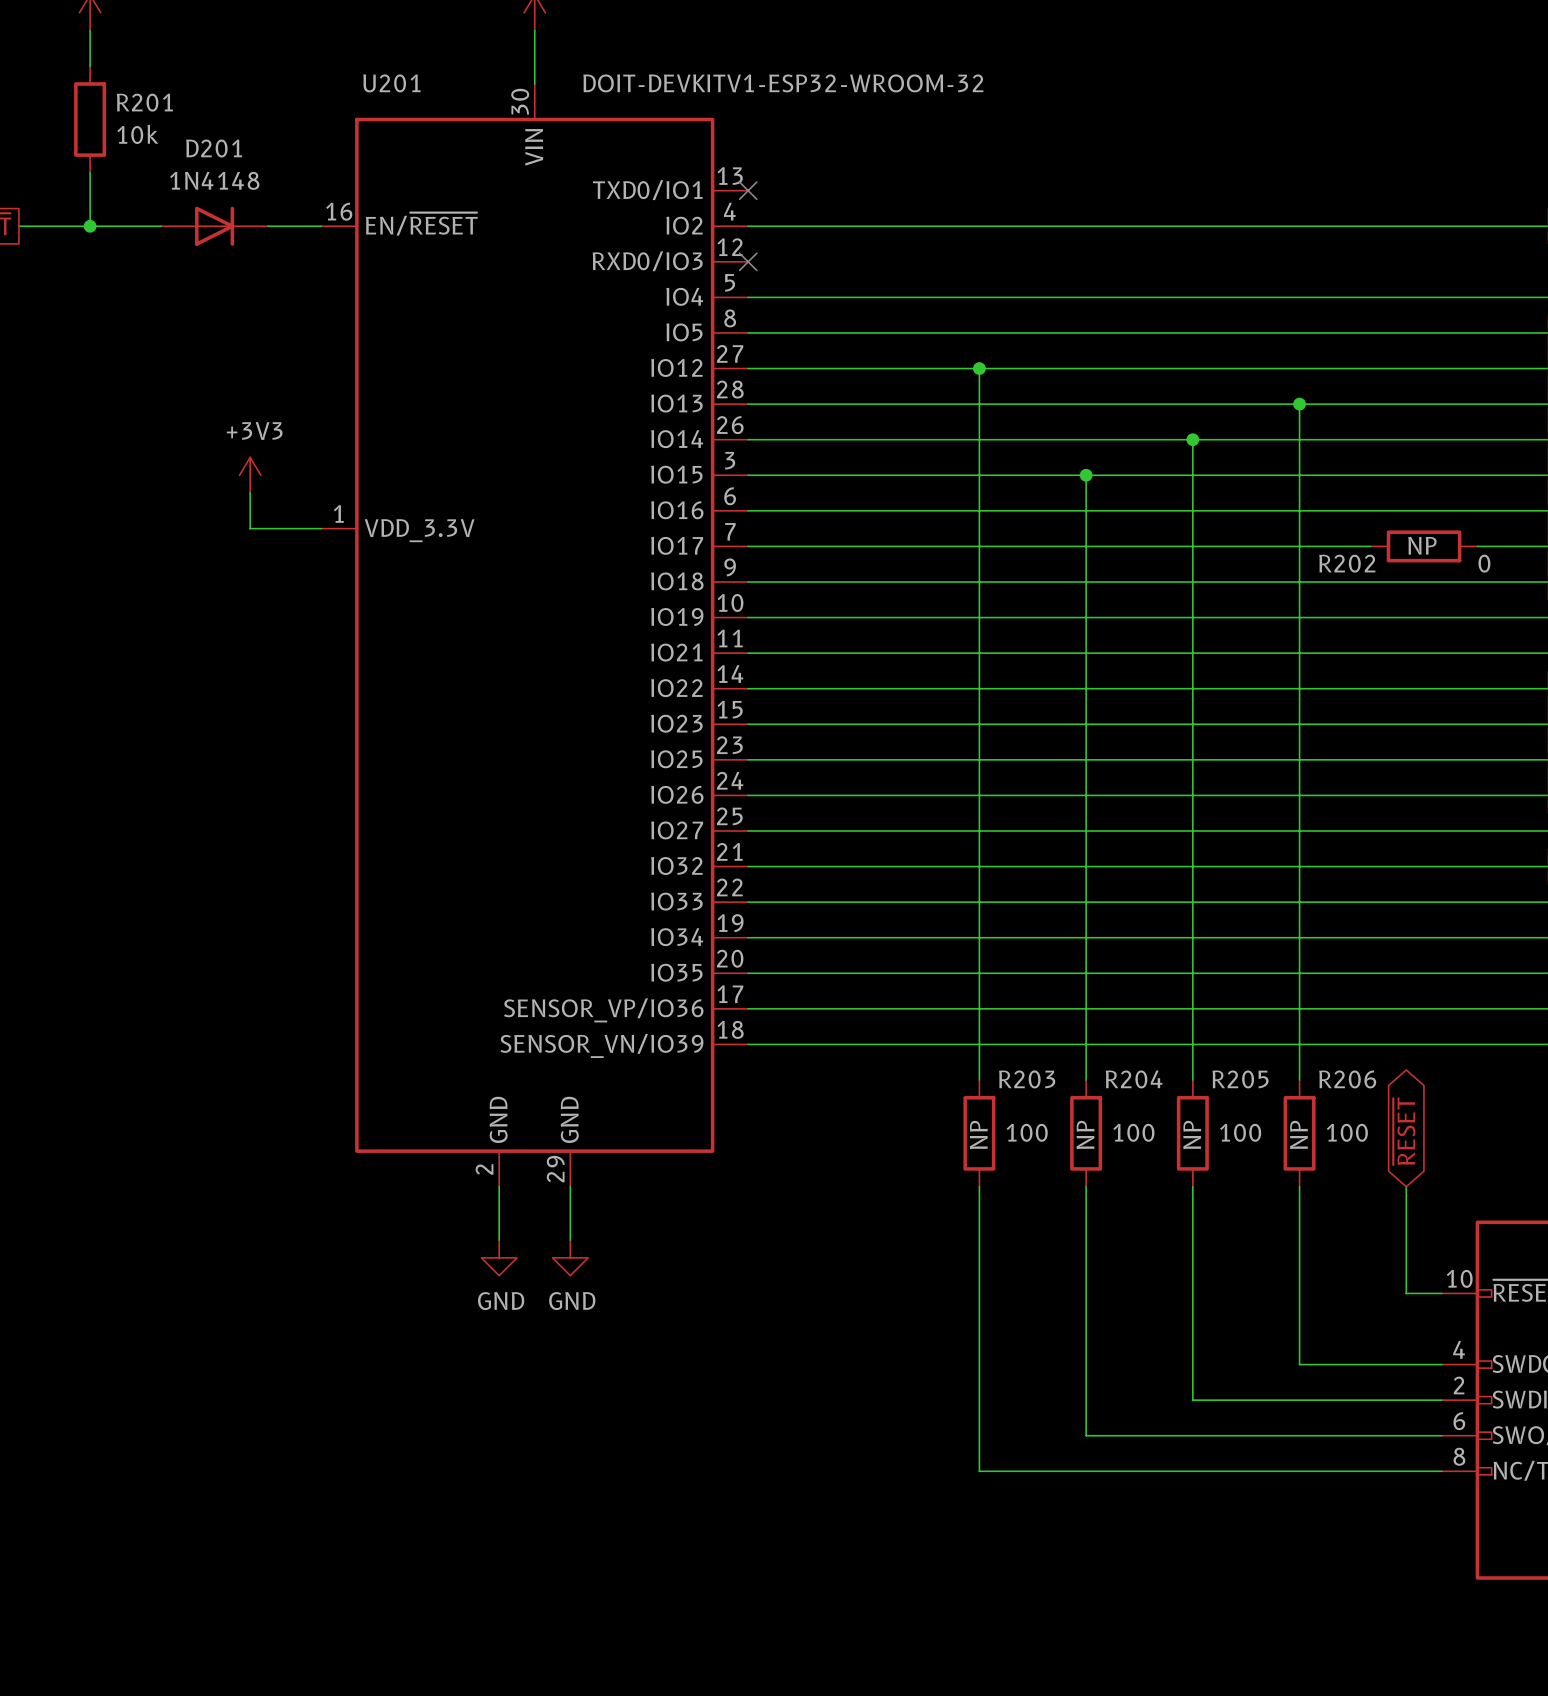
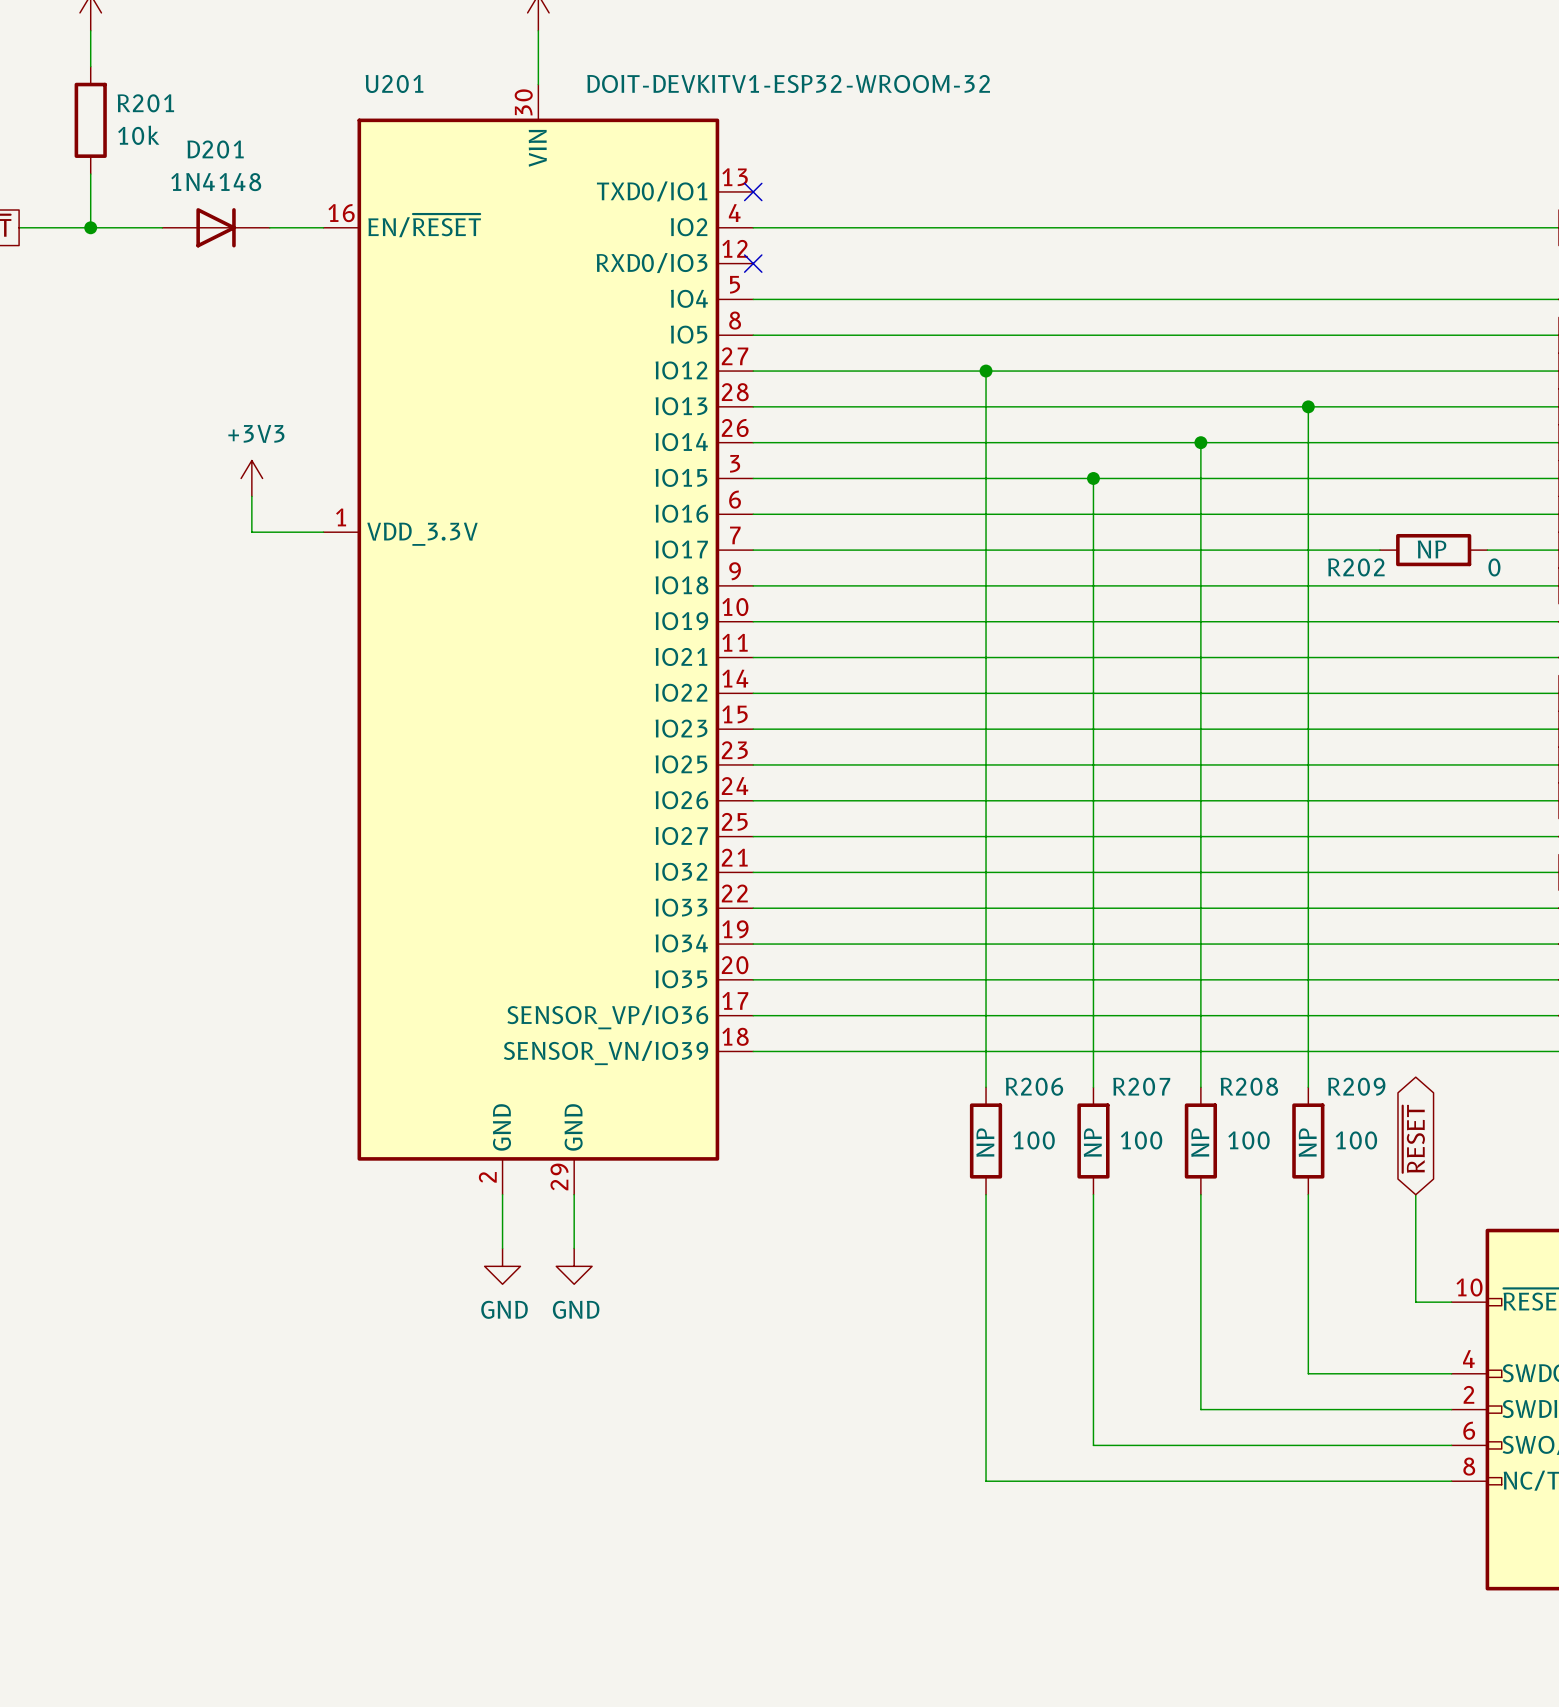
R203 name: R203 (1027, 1079) -> R206 (1034, 1086)
R204 name: R204 (1134, 1079) -> R207 (1141, 1086)
R205 name: R205 (1240, 1079) -> R208 (1249, 1086)
R206 name: R206 (1347, 1079) -> R209 (1356, 1086)

